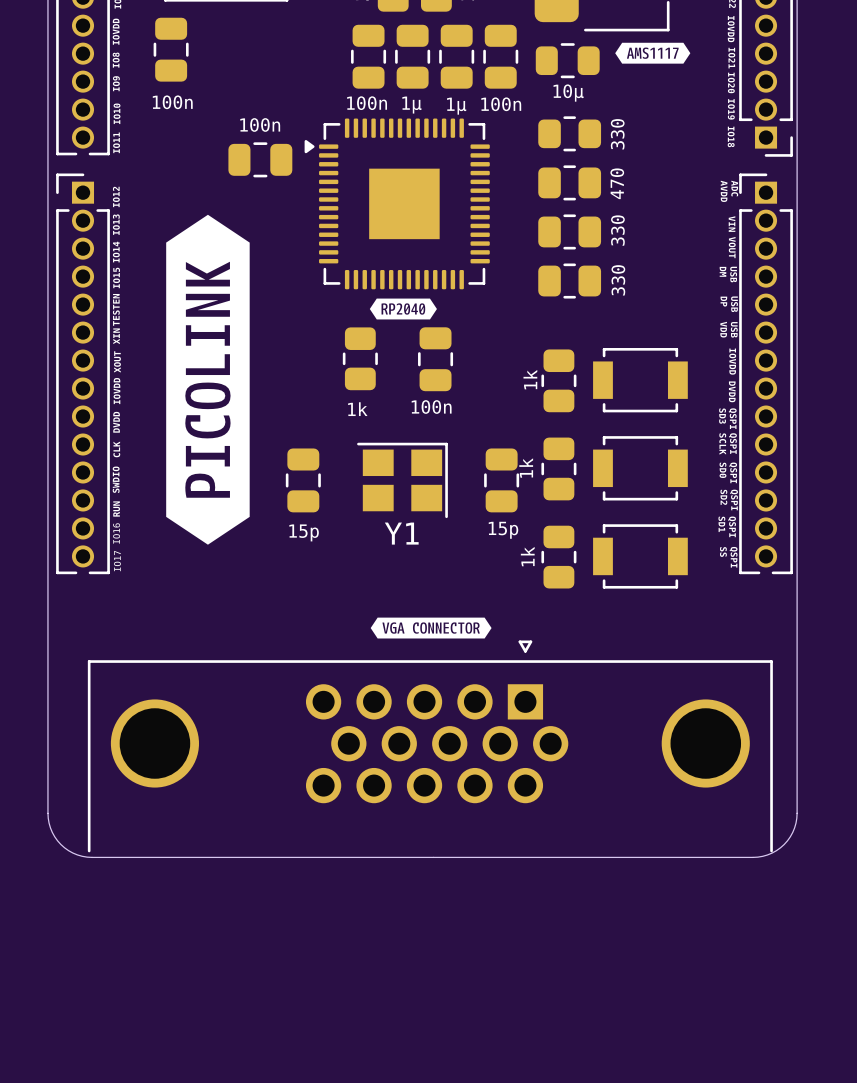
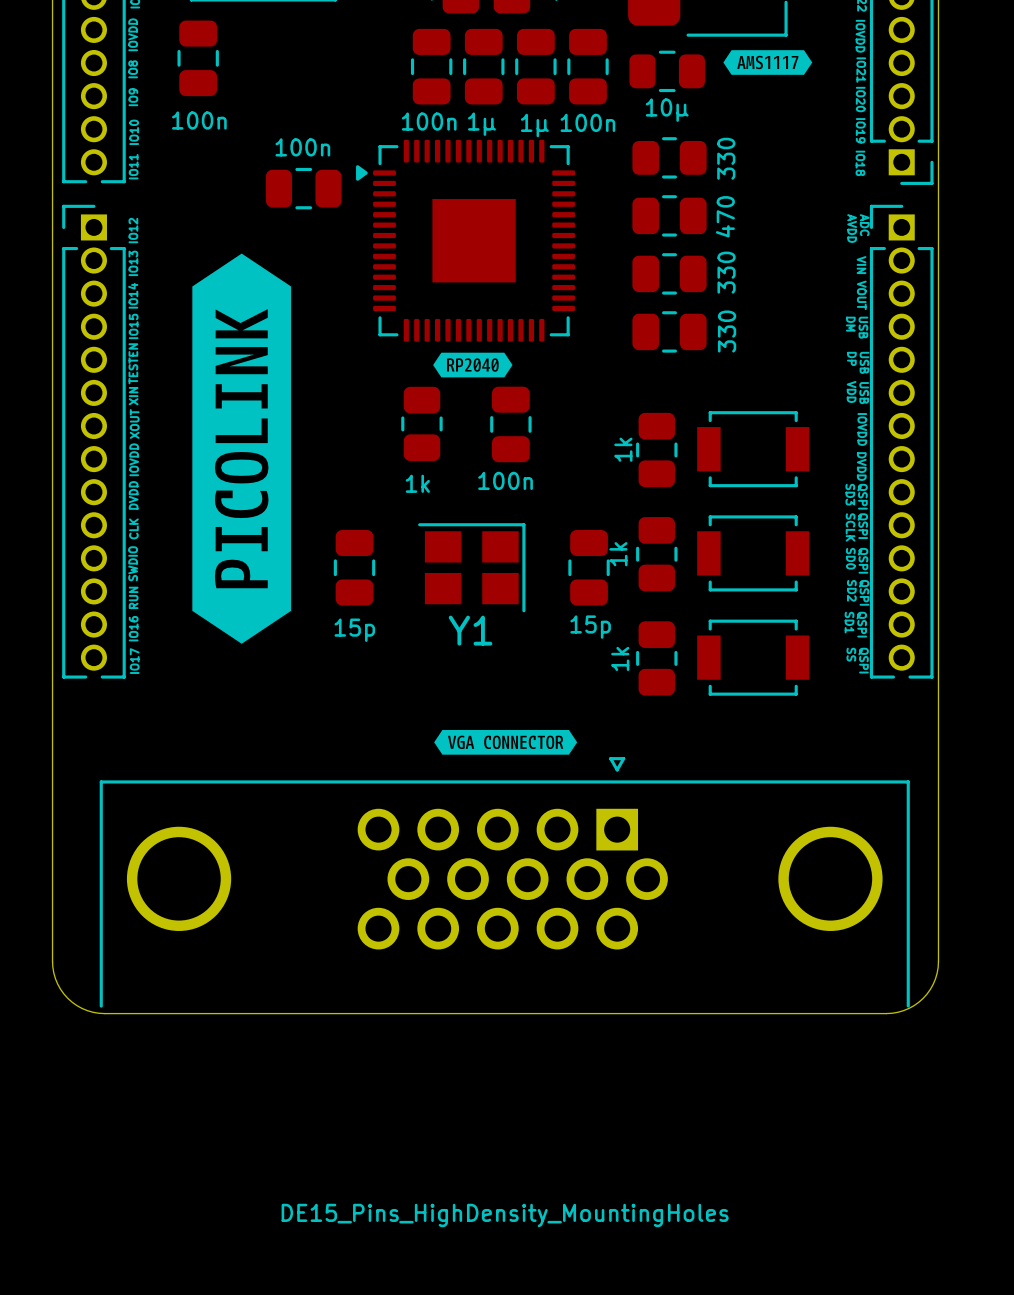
part value: none -> DE15_Pins_HighDensity_MountingHoles (505, 1215)

